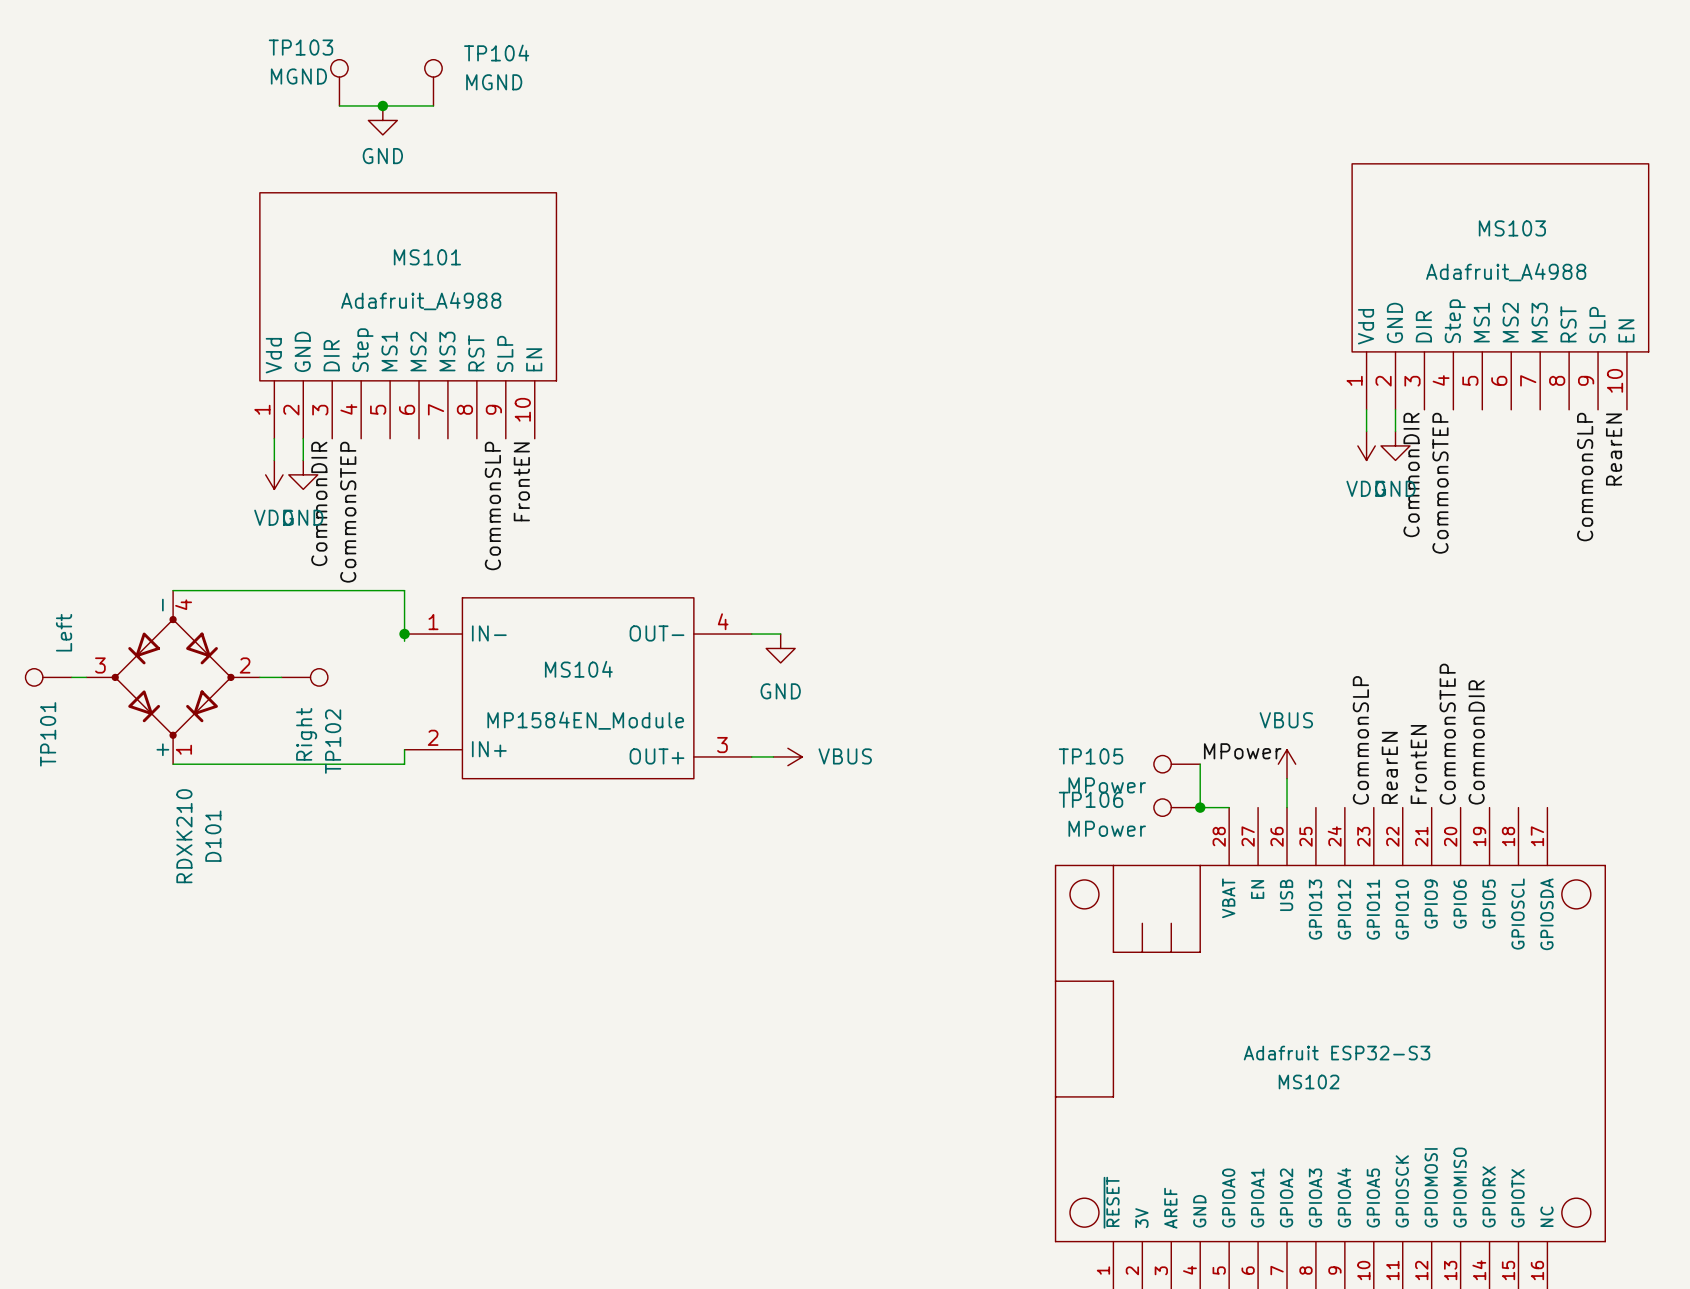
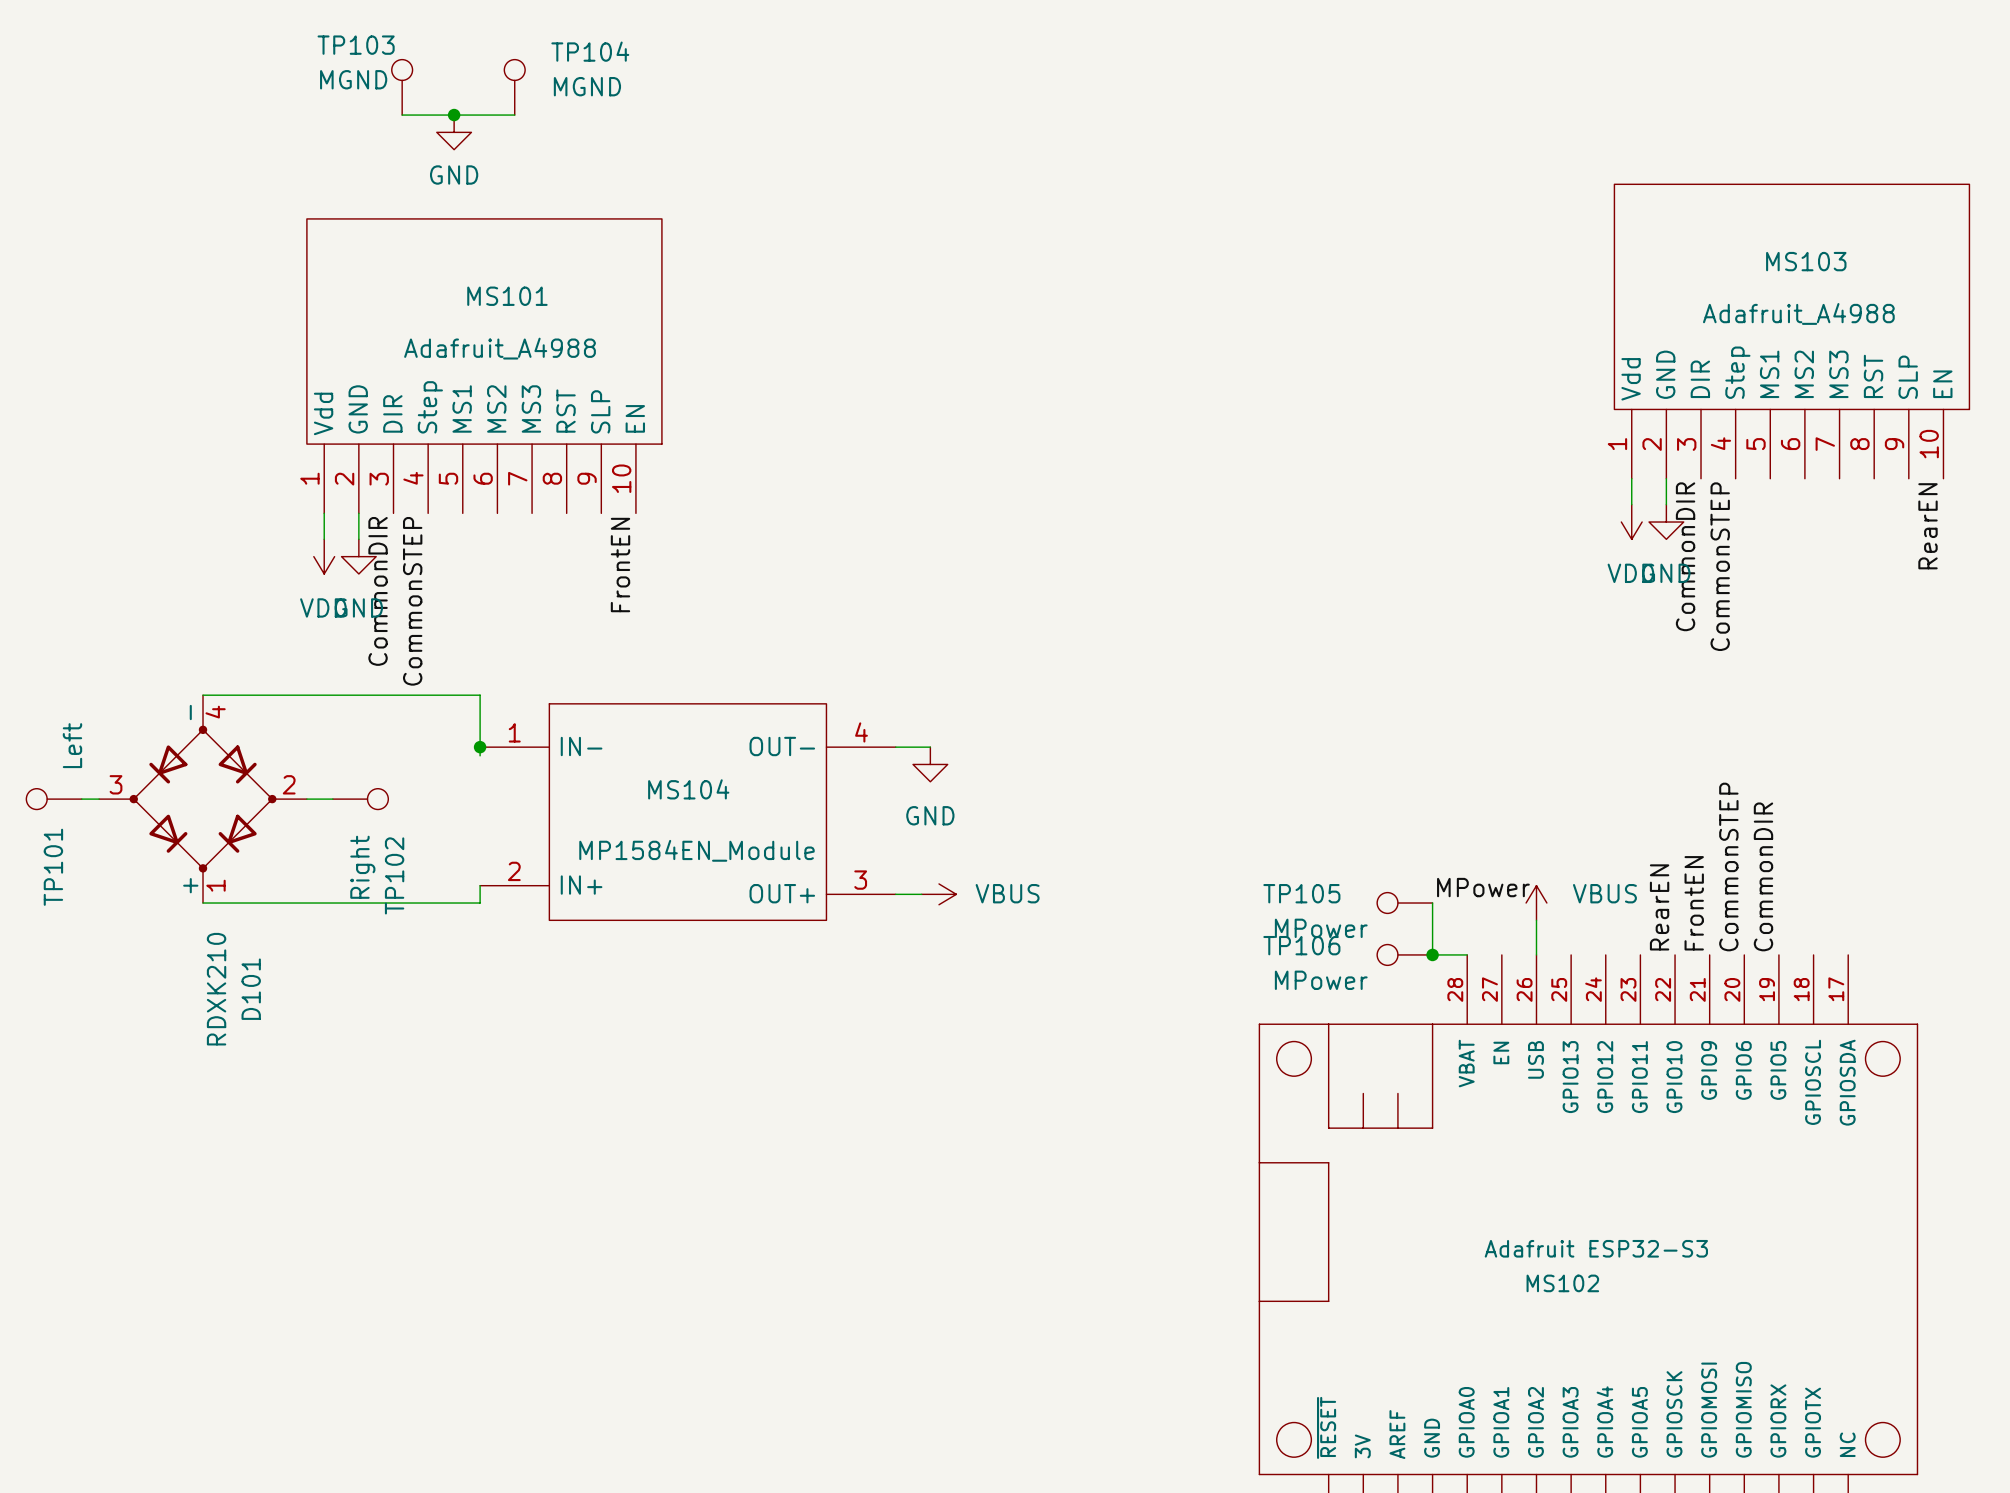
label: CommonSLP (1585, 477) -> none
label: CommonSLP (492, 505) -> none
power symbol text position: VBUS (1286, 720) -> VBUS (1604, 893)
label: CommonSLP (1360, 740) -> none

